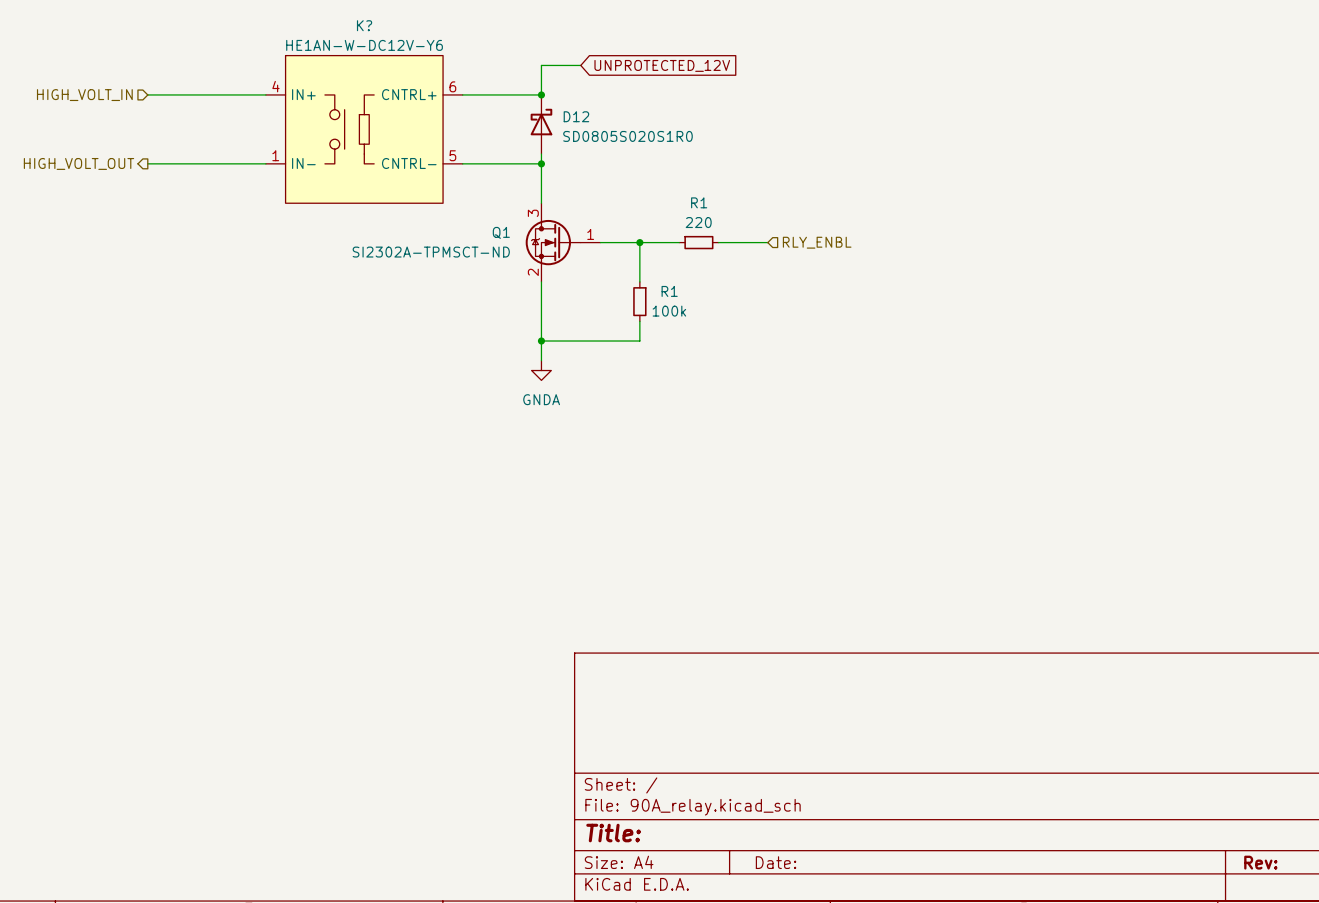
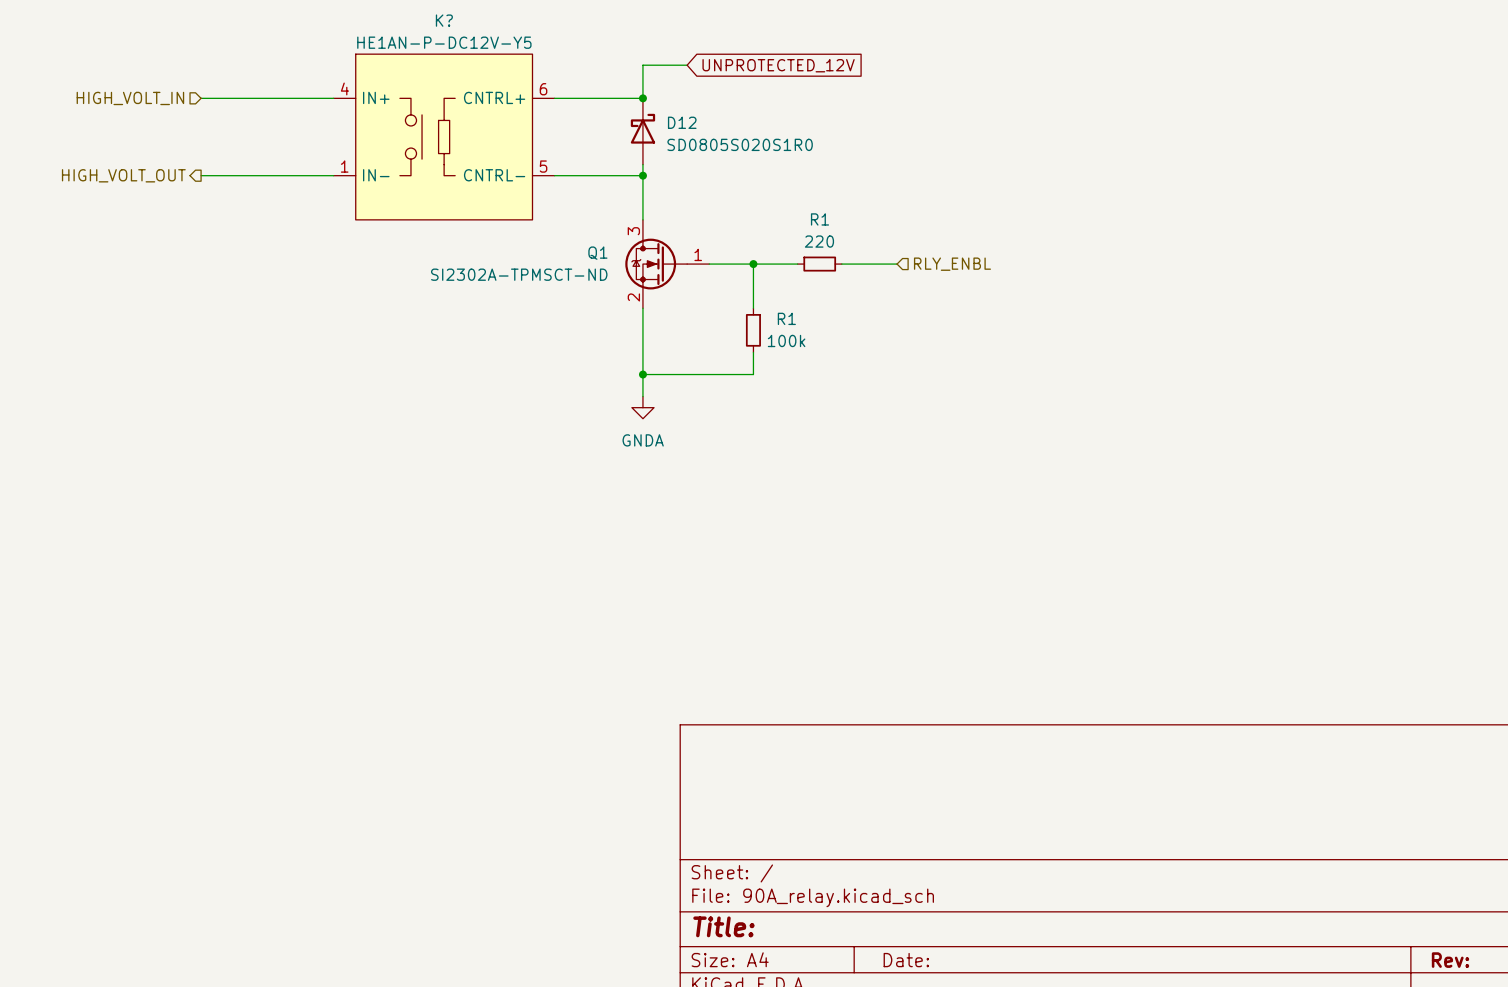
K? value: HE1AN-W-DC12V-Y6 (364, 45) -> HE1AN-P-DC12V-Y5 (444, 42)

